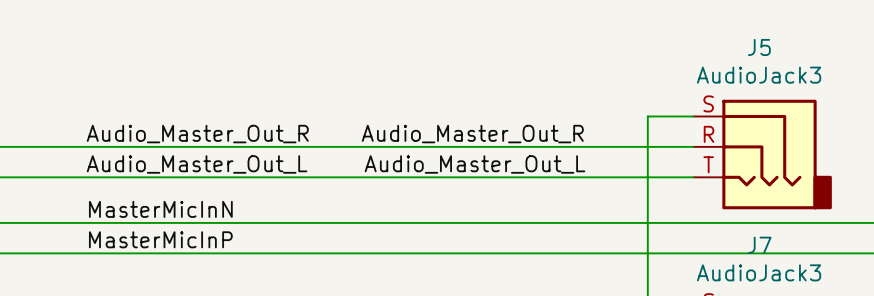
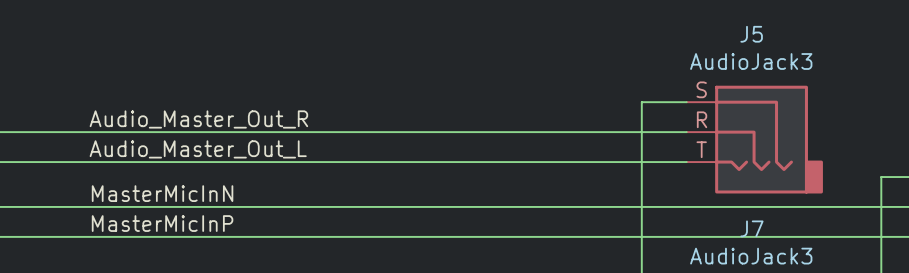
label: Audio_Master_Out_R (472, 134) -> none
label: Audio_Master_Out_L (474, 164) -> none

